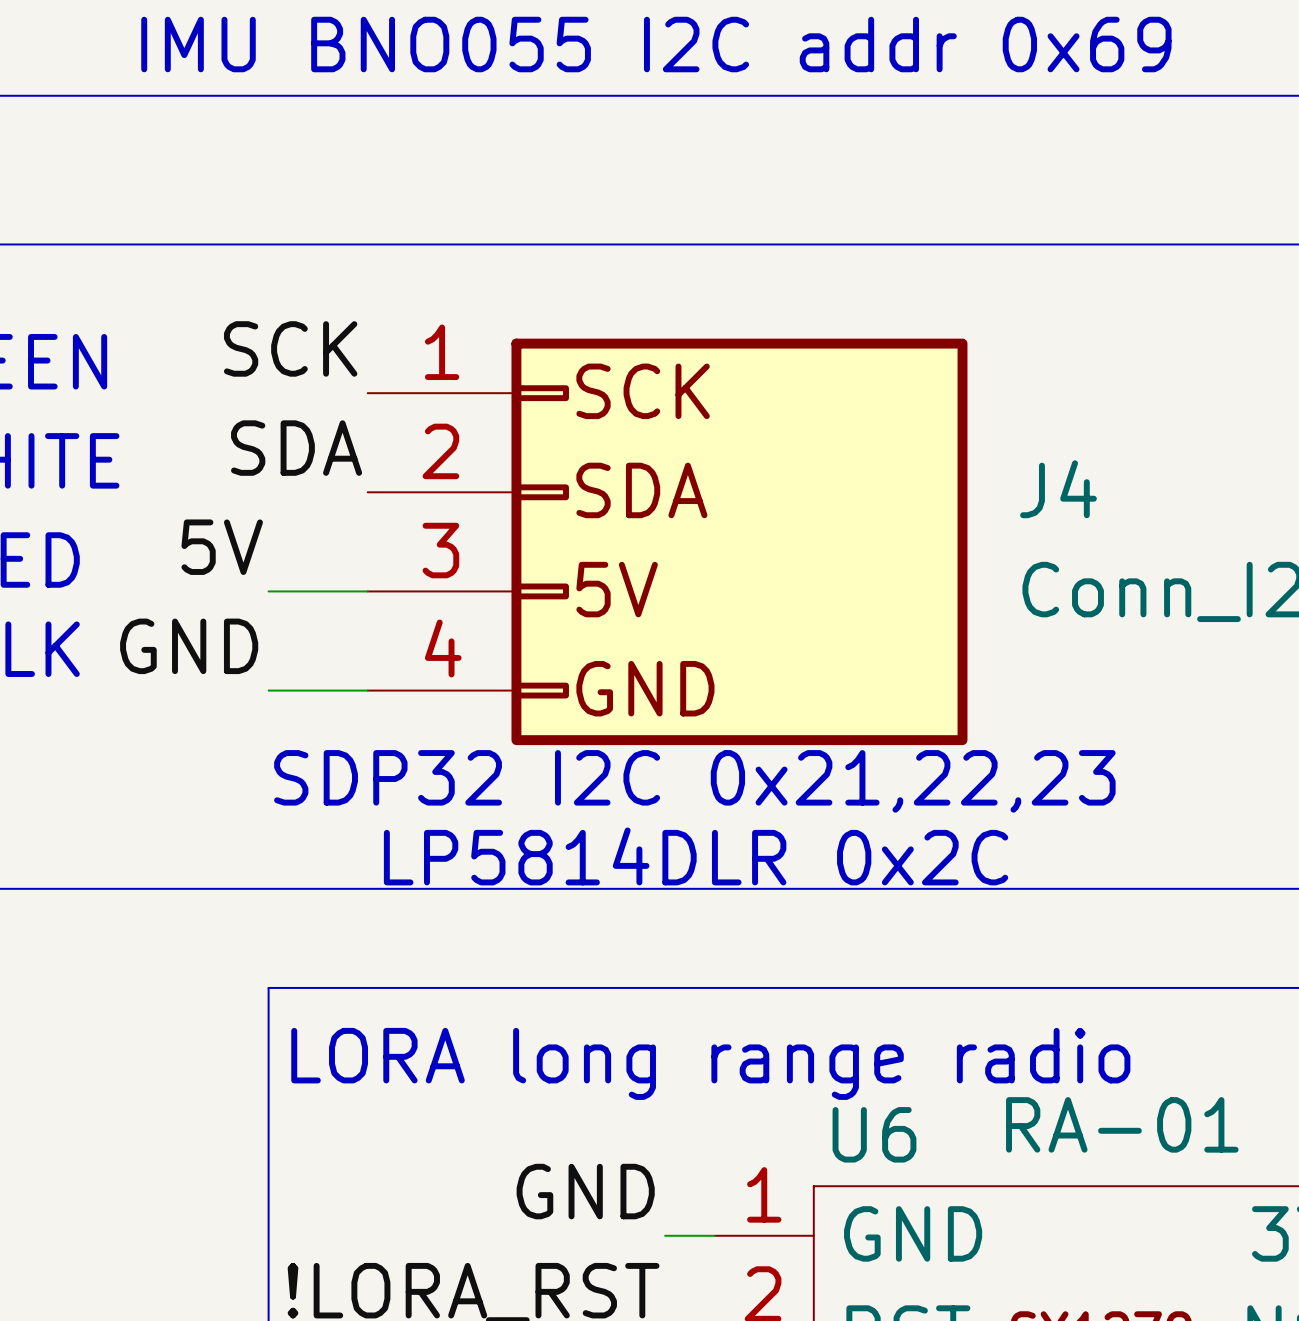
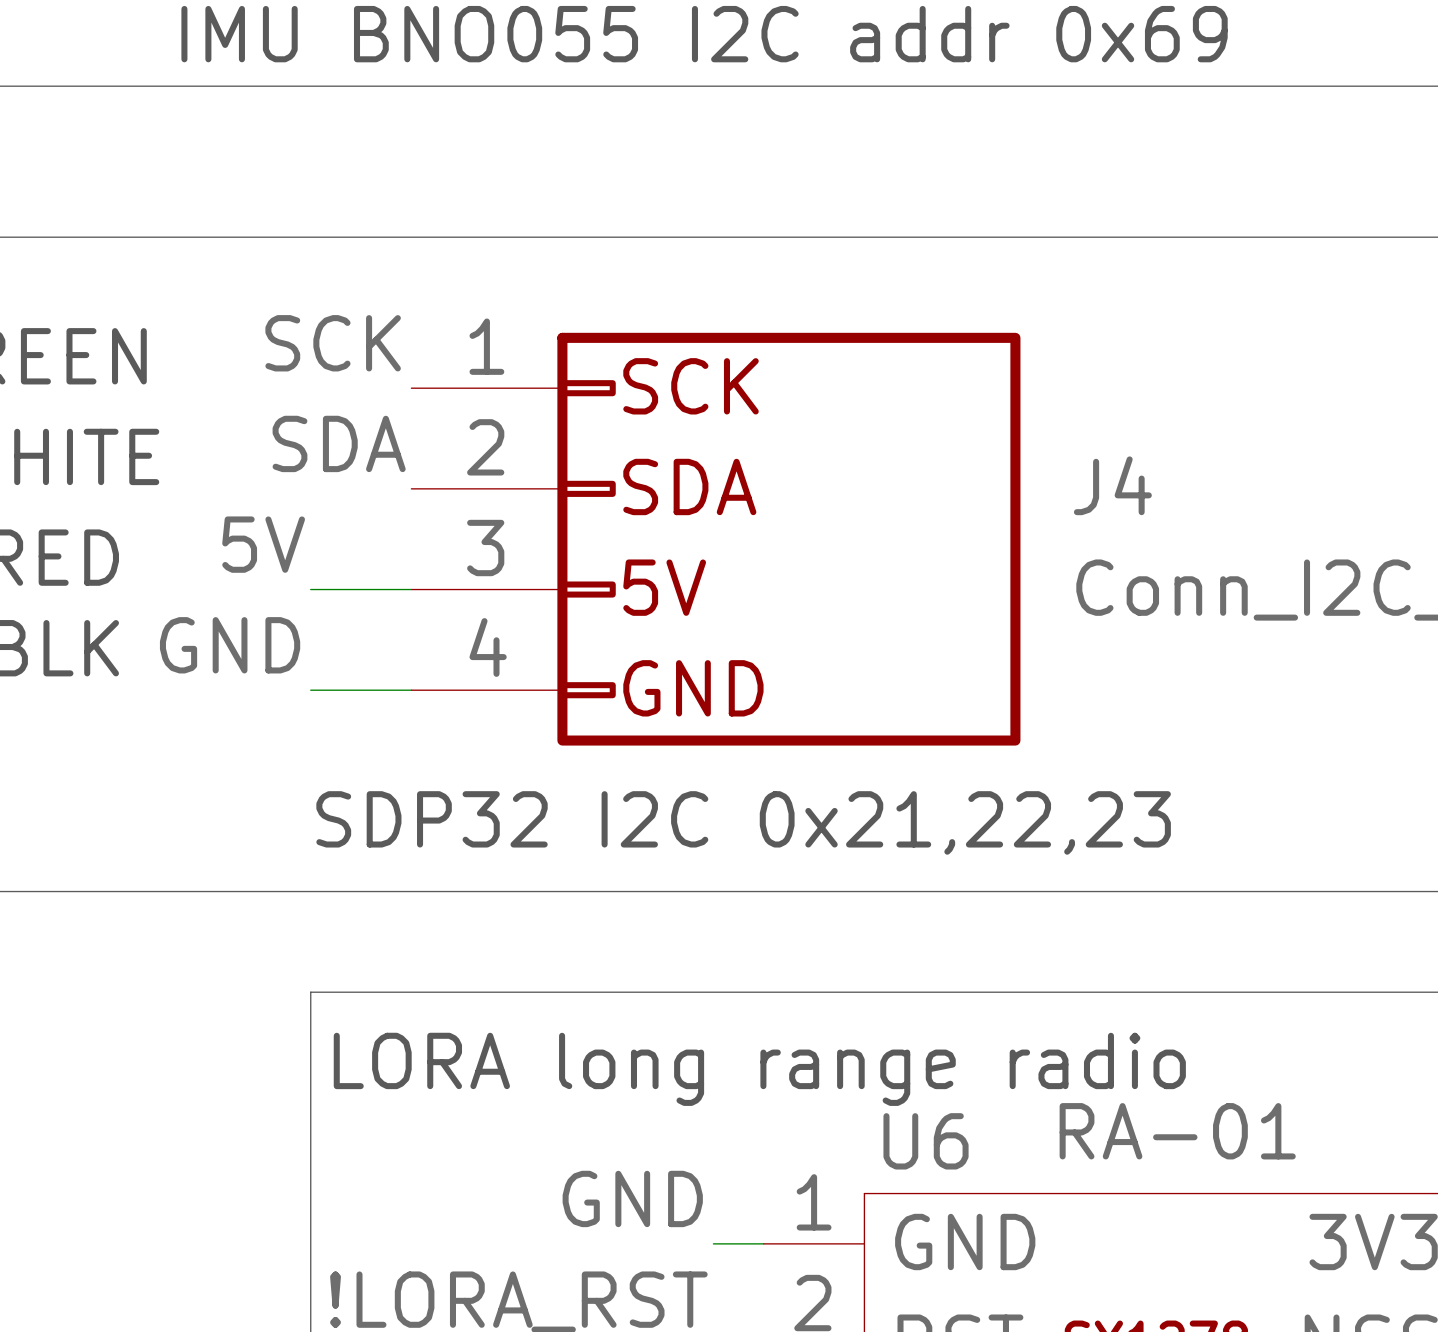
text position: SDP32 I2C 0x21,22,23 (694, 781) -> SDP32 I2C 0x21,22,23 (743, 822)
text: LP5814DLR 0x2C (696, 856) -> none

